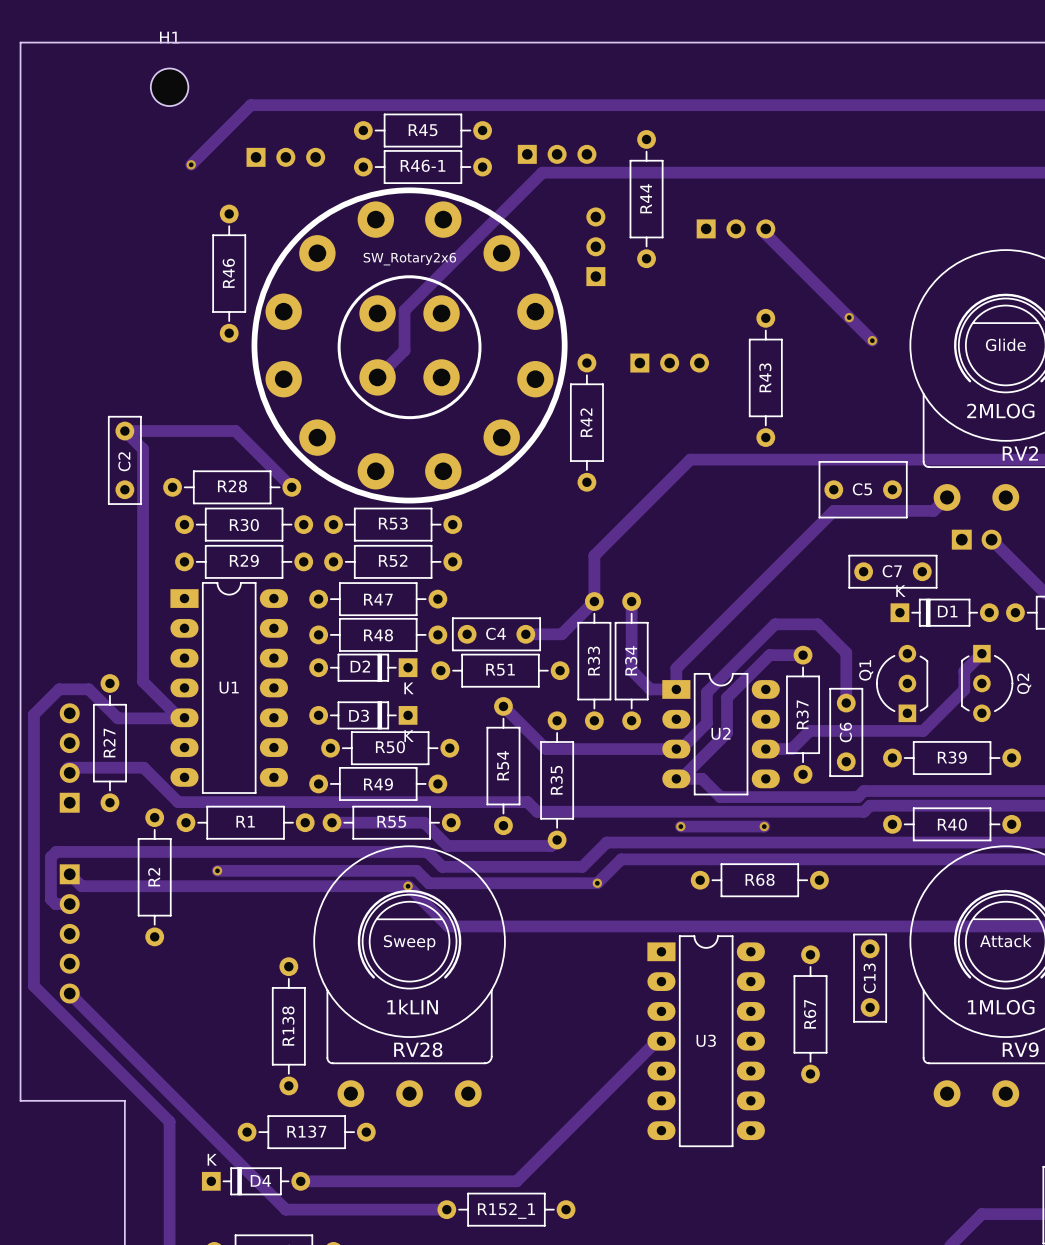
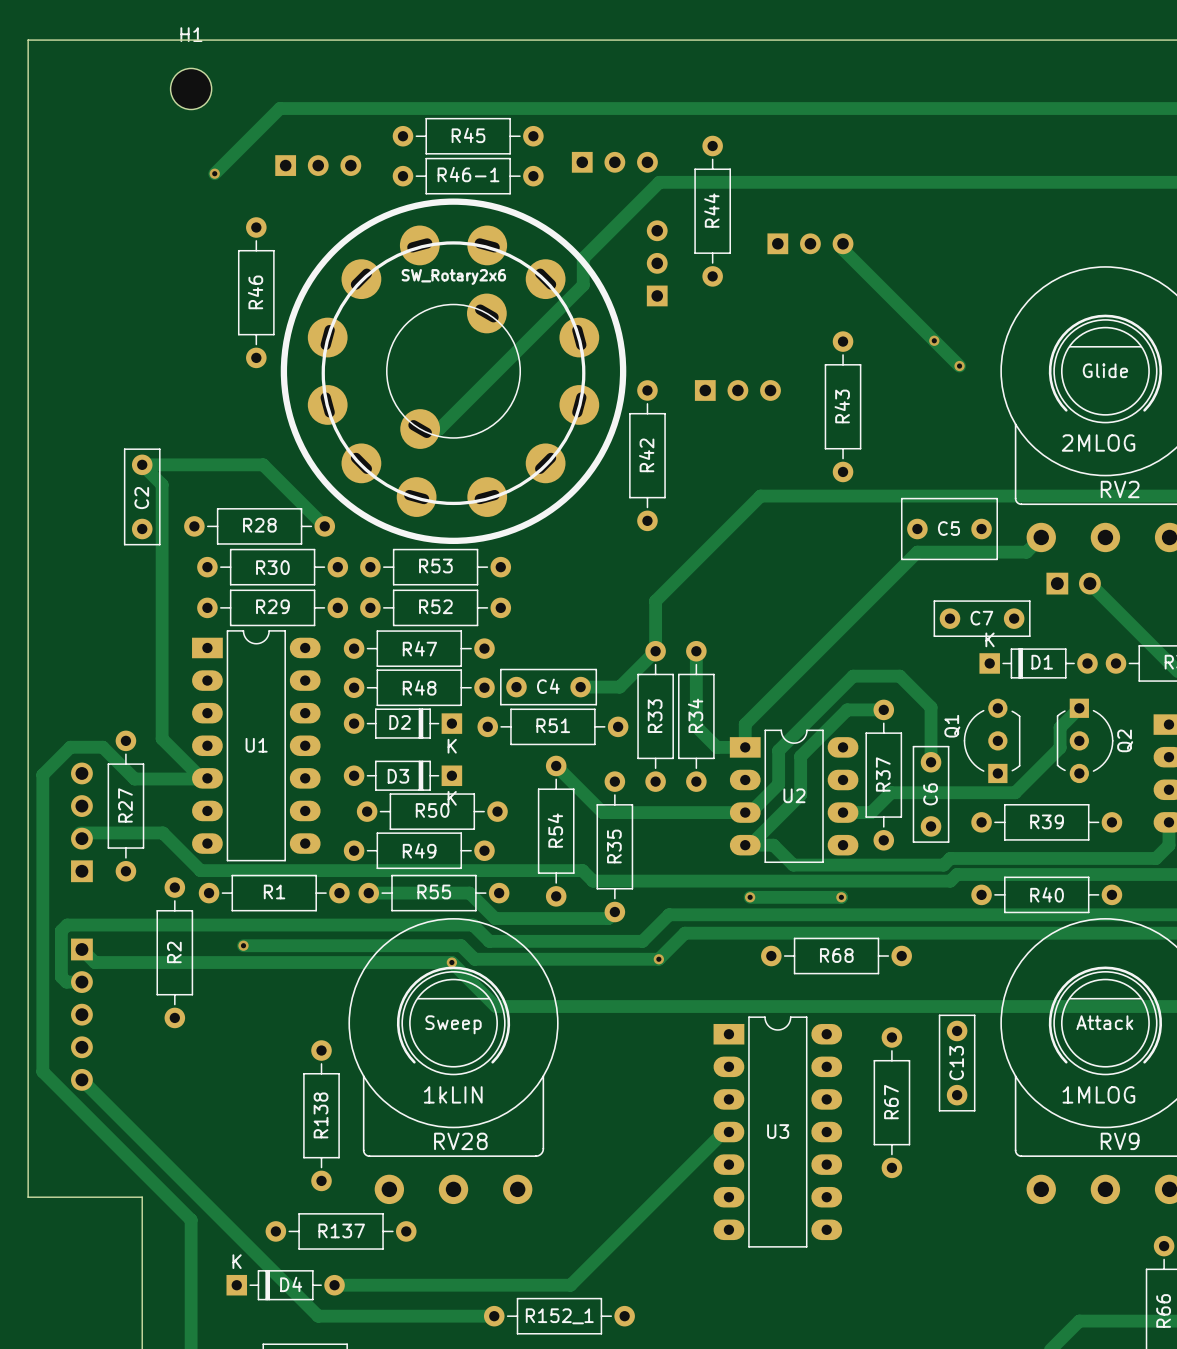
track: (597, 172) (542, 172) (404, 310) (404, 350) (377, 377) -> (659, 182) (583, 258) (583, 285) (439, 429) (420, 429)
part footprint: [251, 187, 568, 504] -> [280, 198, 627, 545]

